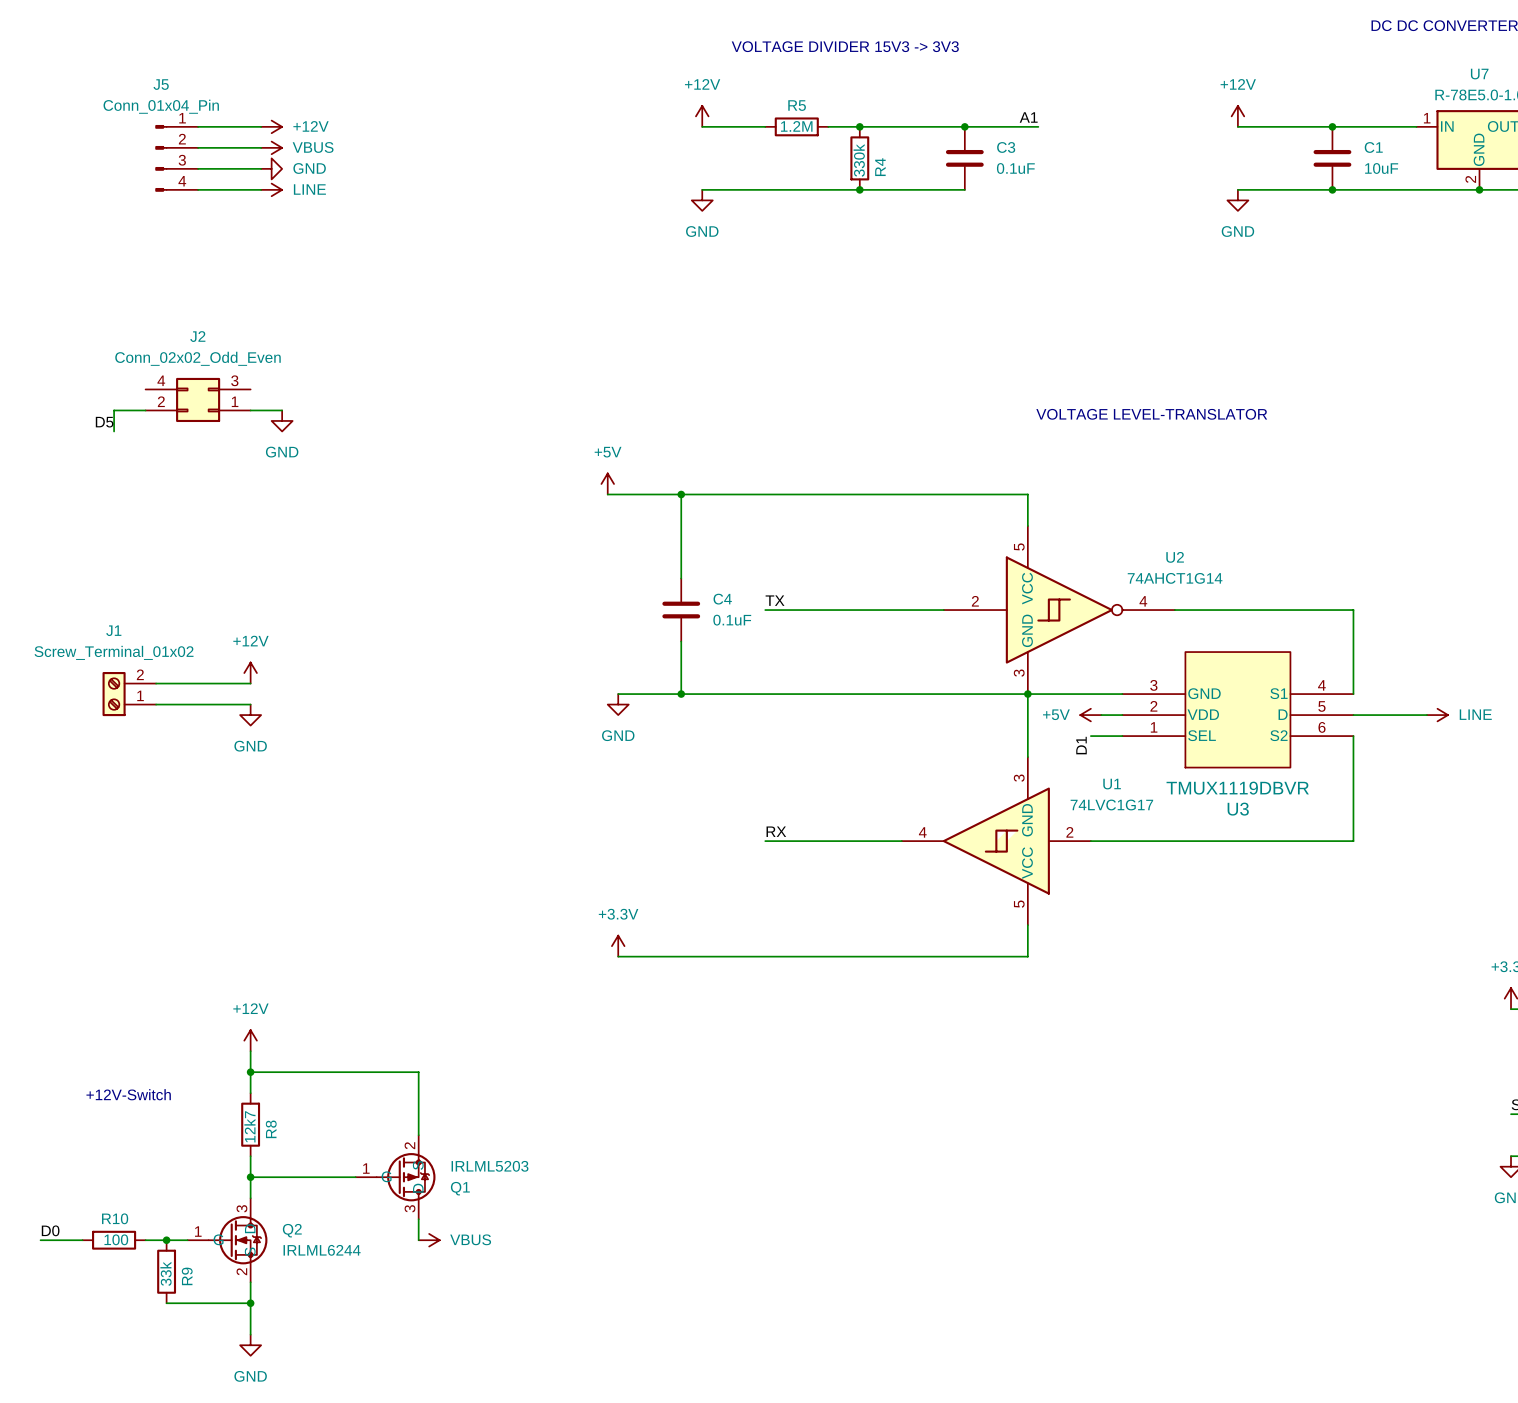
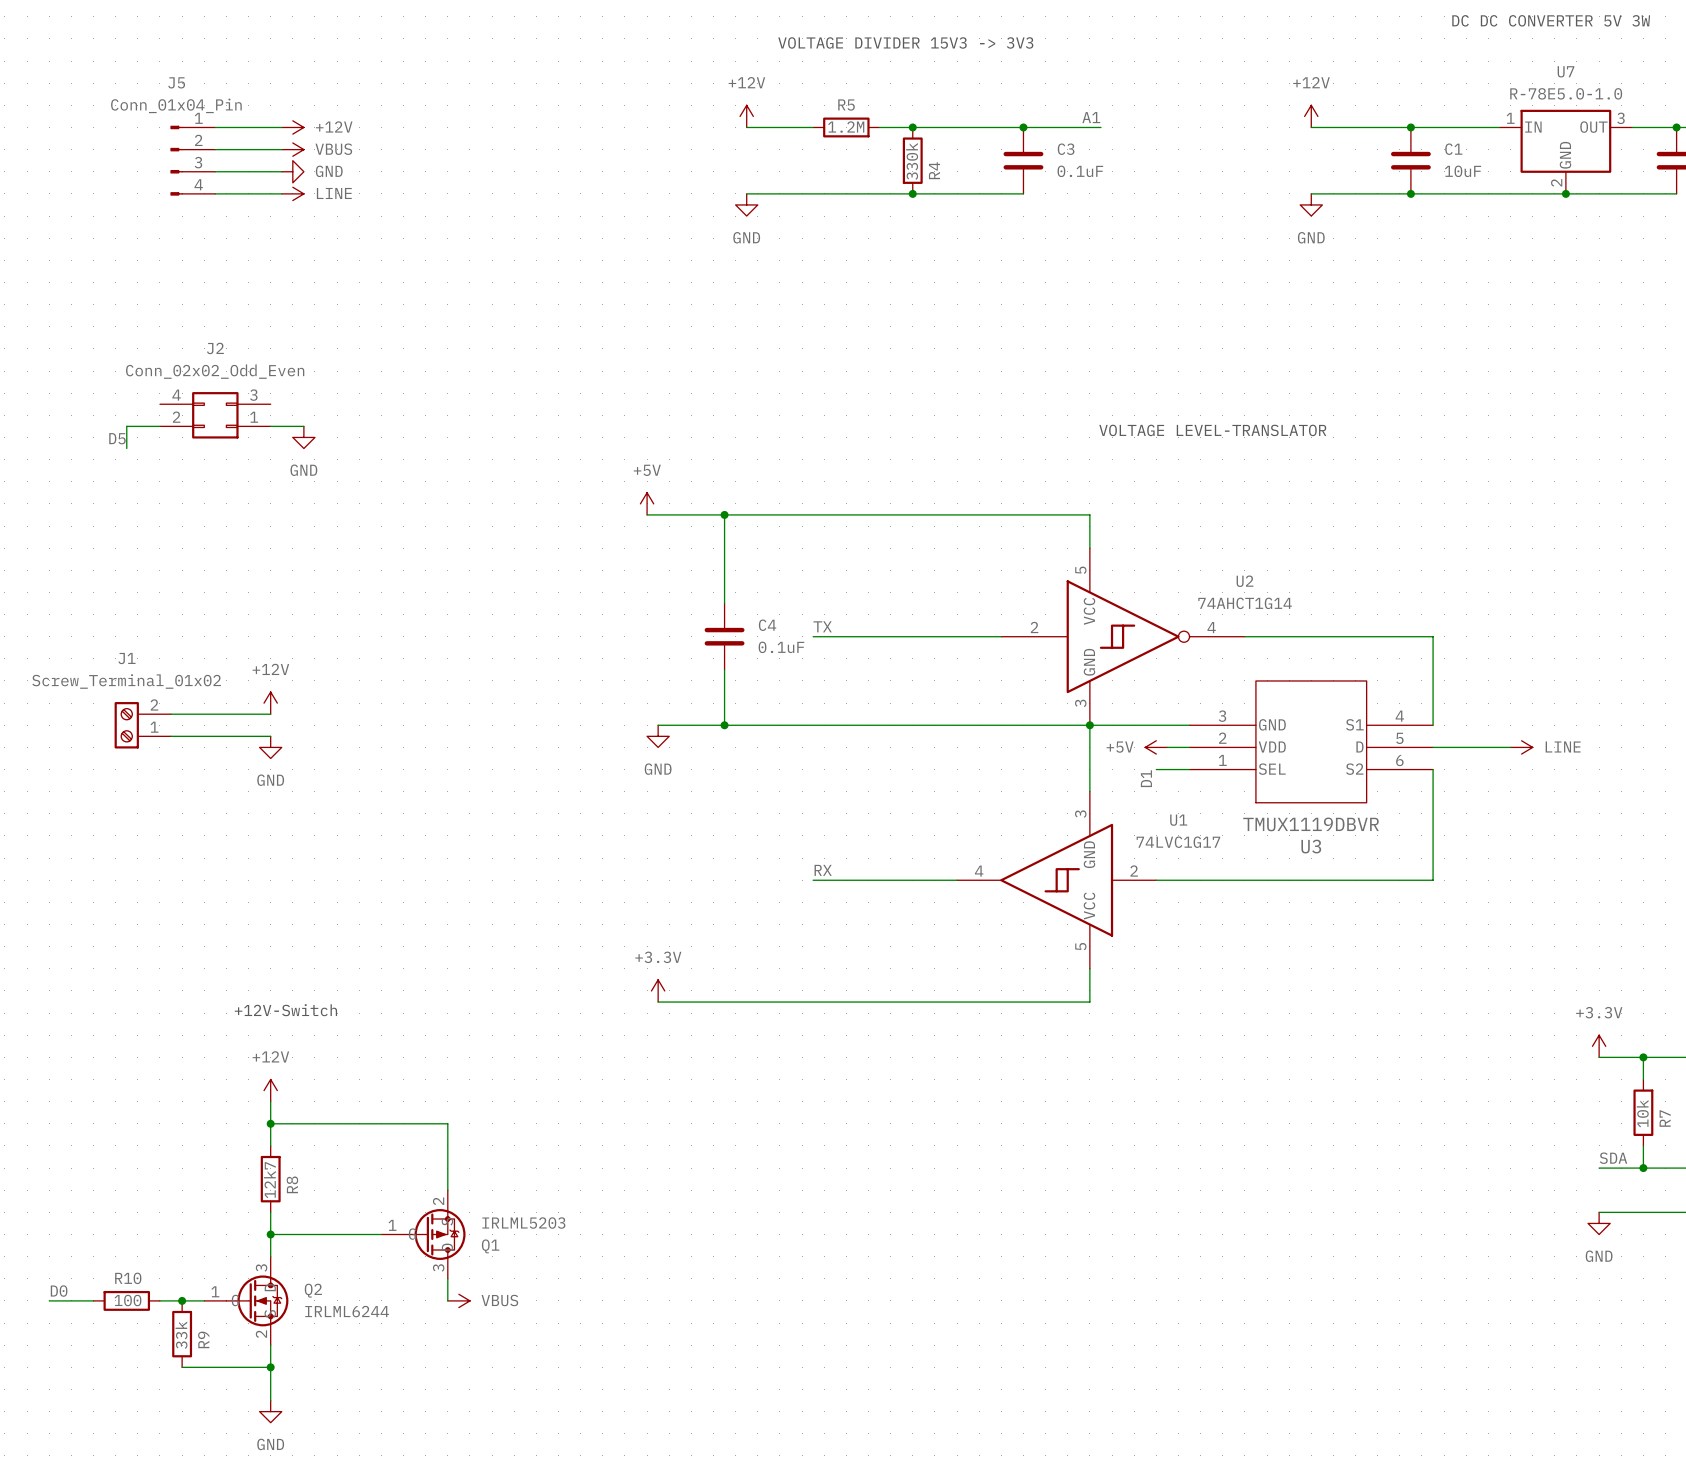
text position: +12V-Switch (128, 1094) -> +12V-Switch (285, 1010)

